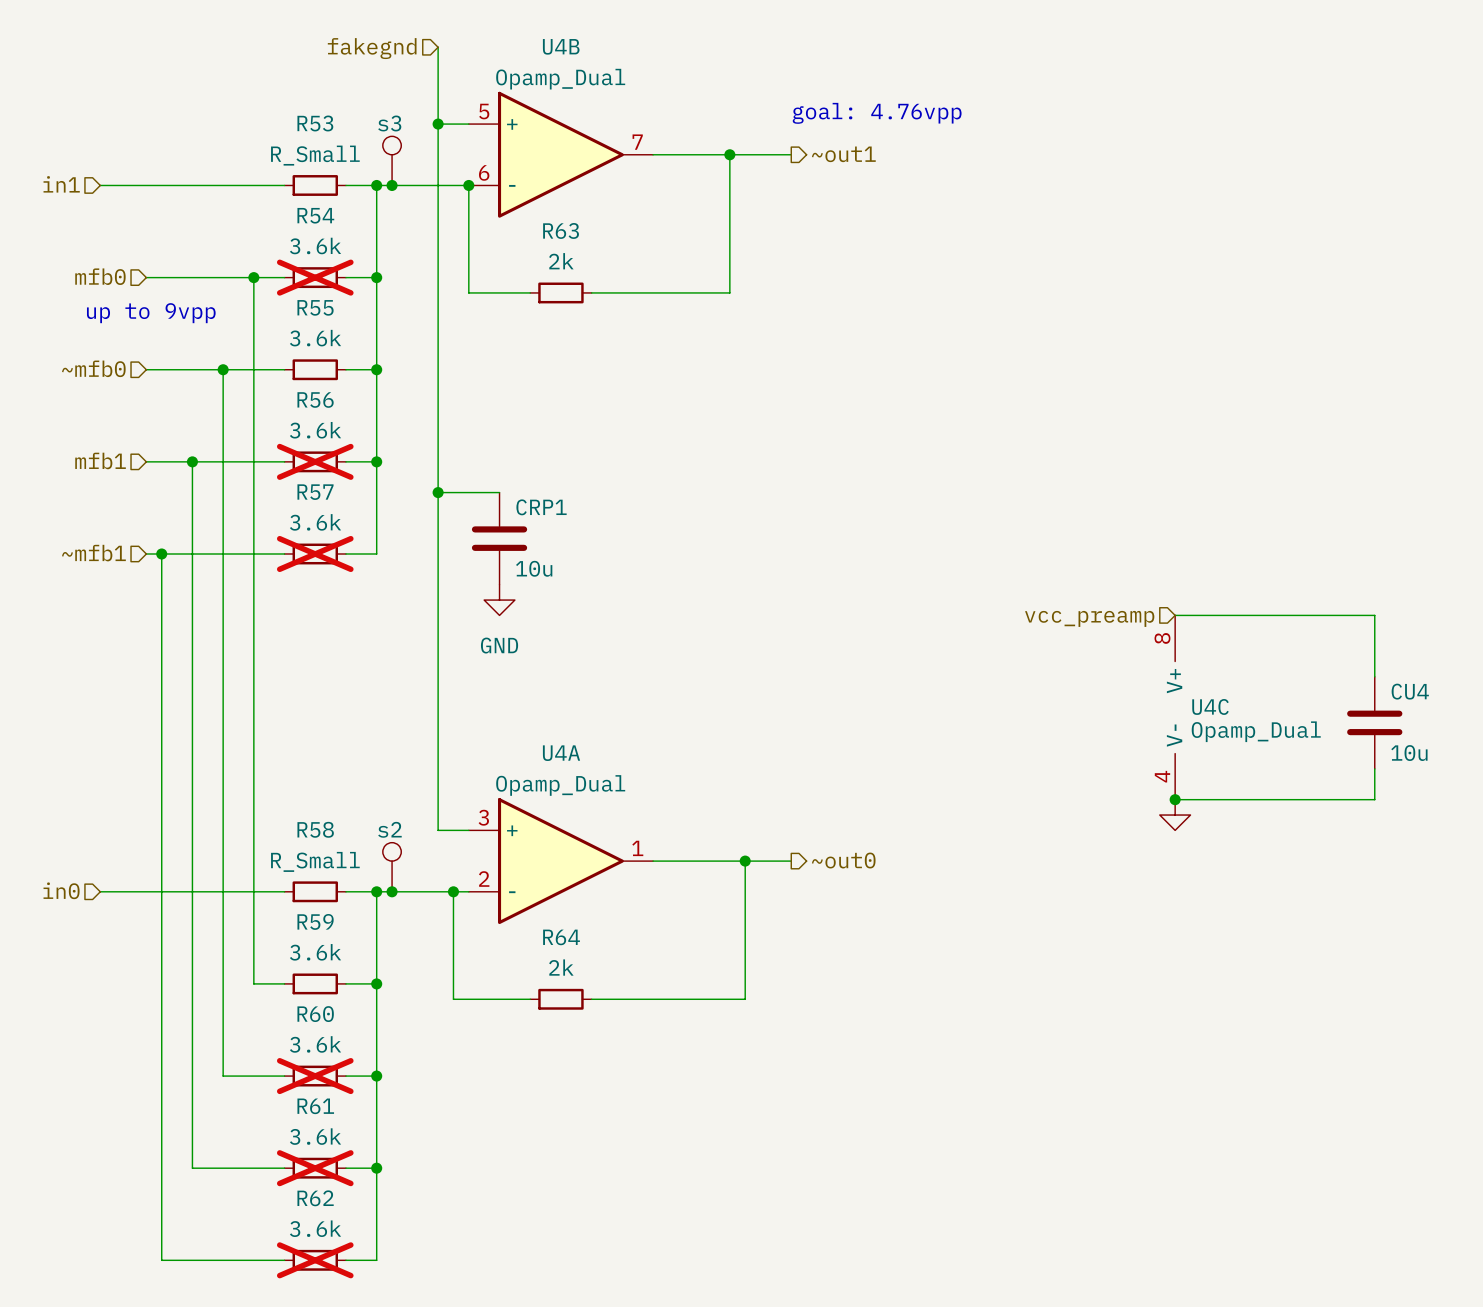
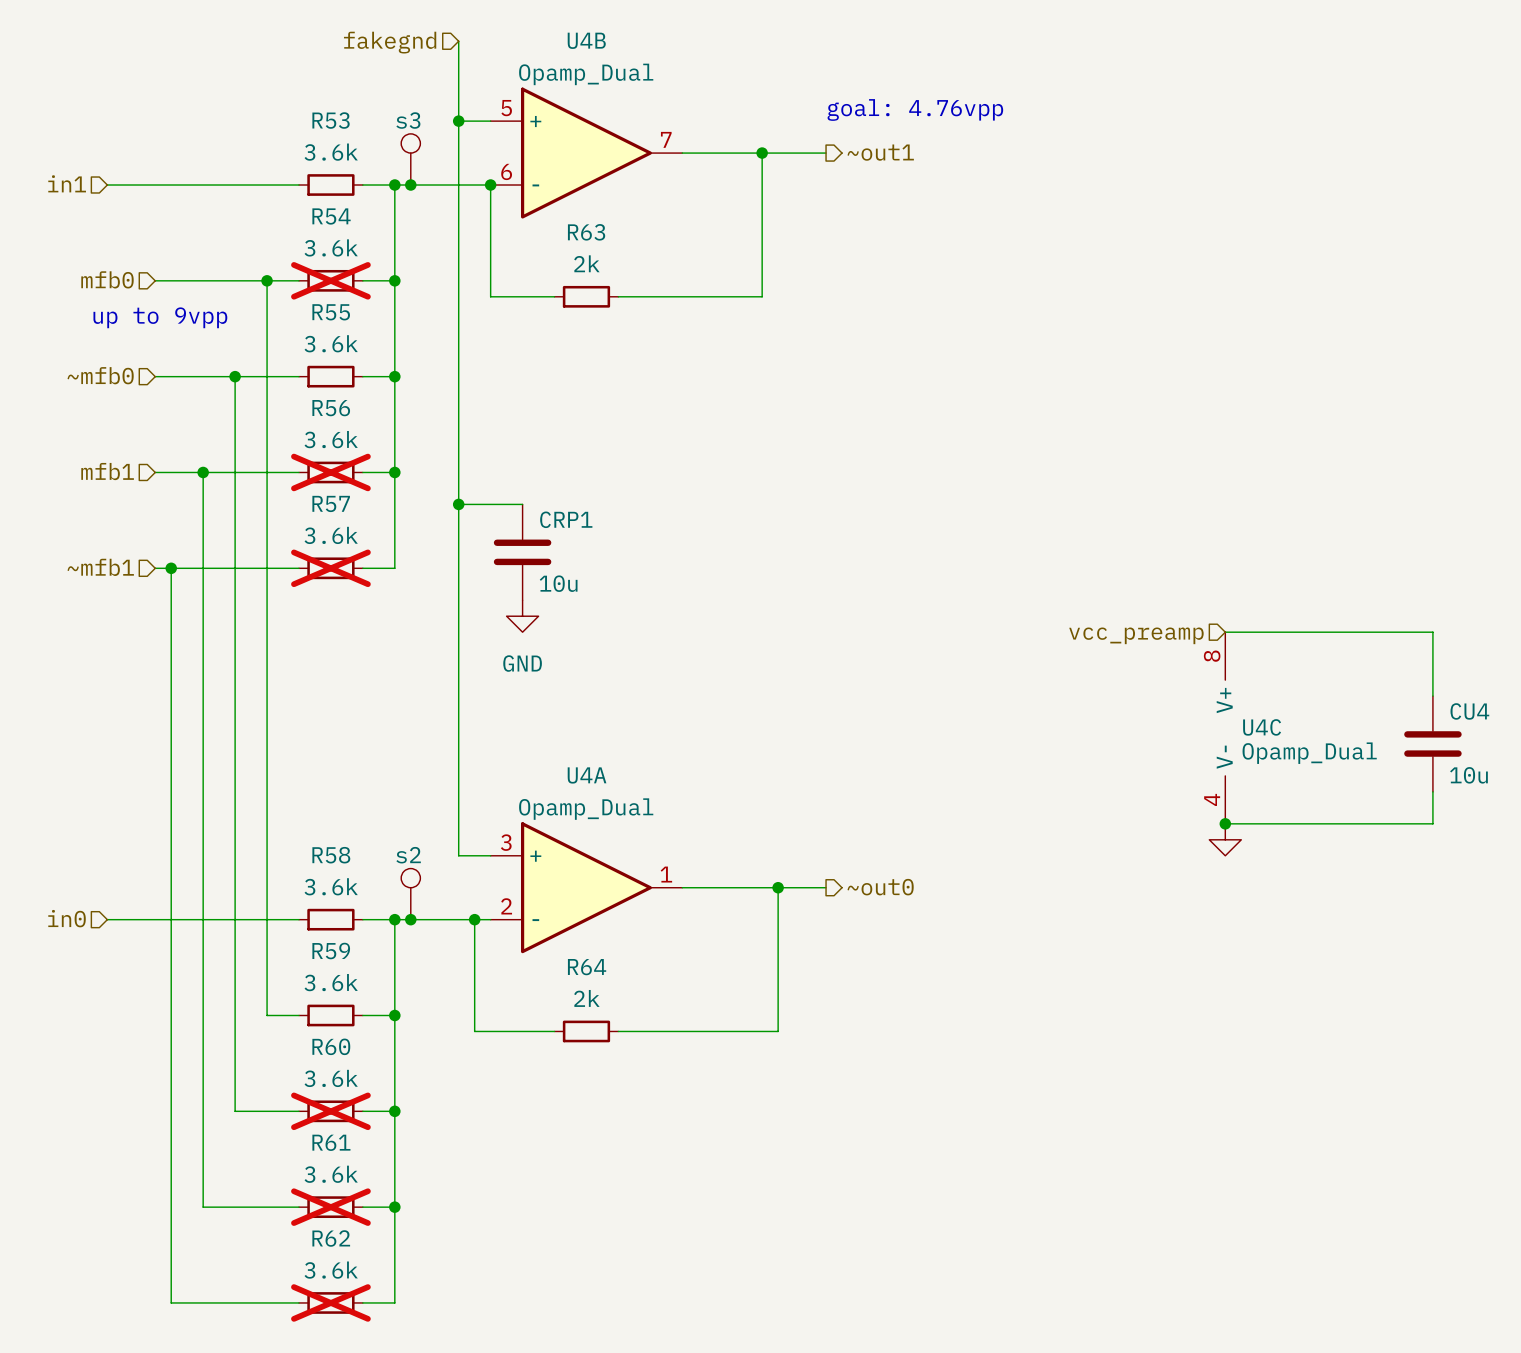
R53 value: R_Small (315, 155) -> 3.6k (331, 152)
R58 value: R_Small (315, 861) -> 3.6k (331, 886)

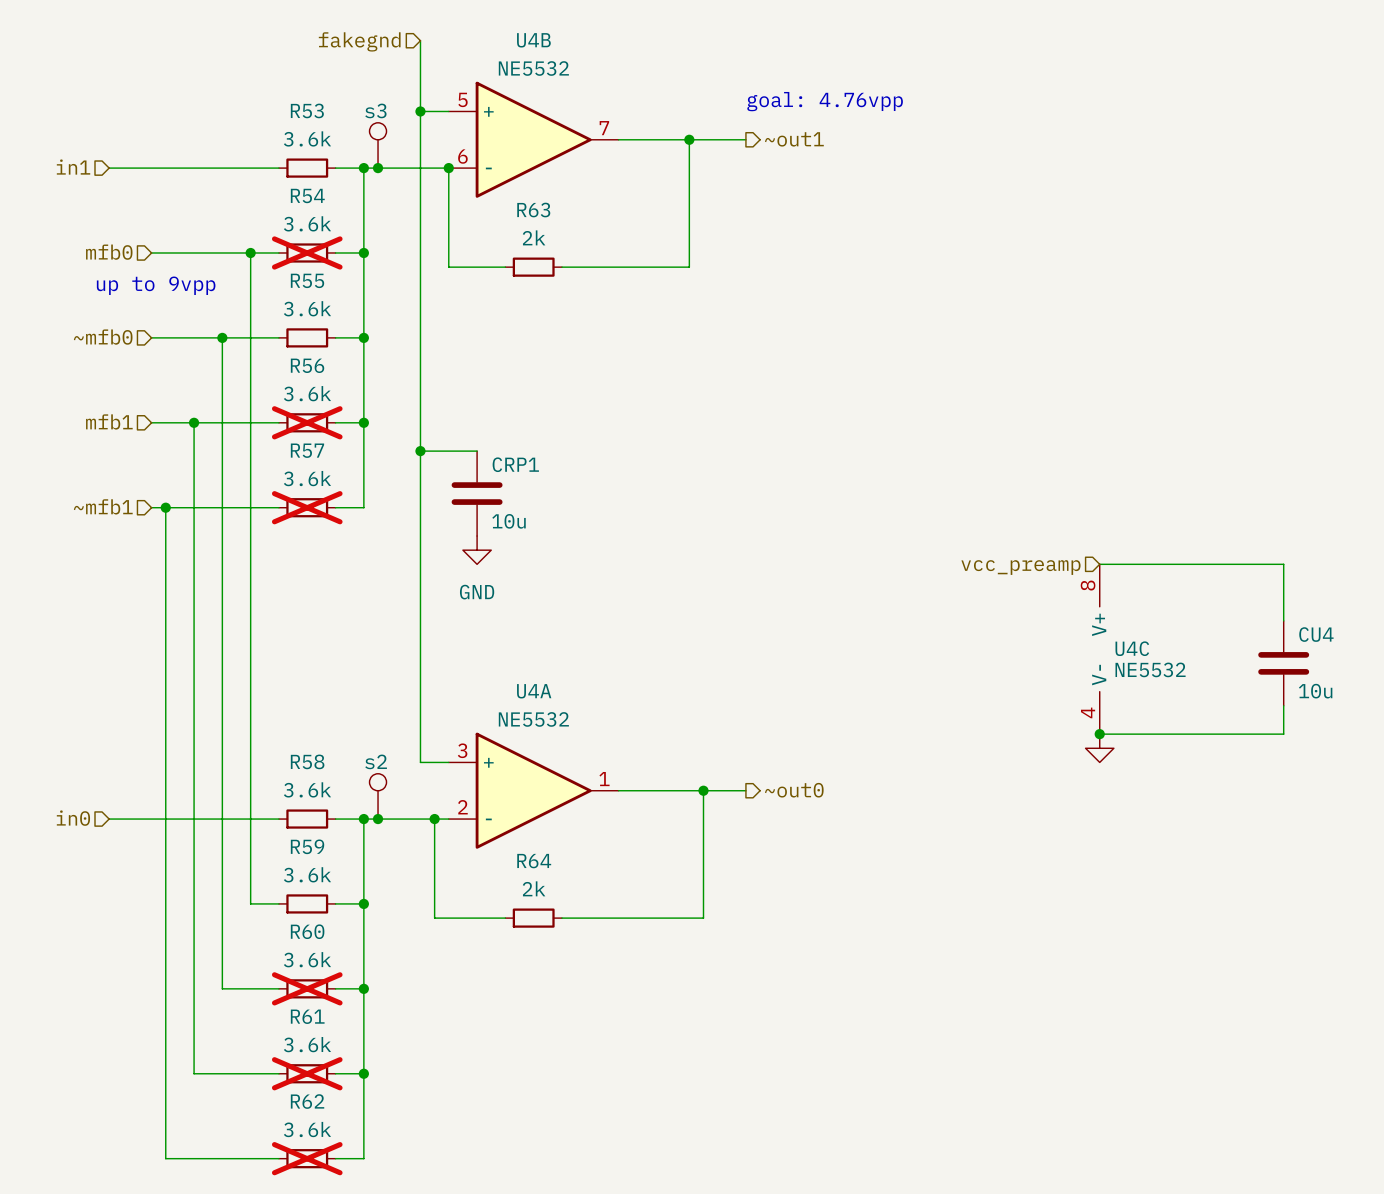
U4B value: Opamp_Dual (586, 74) -> NE5532 (533, 68)
U4C value: Opamp_Dual (1309, 753) -> NE5532 (1150, 669)
U4A value: Opamp_Dual (586, 809) -> NE5532 (533, 719)

